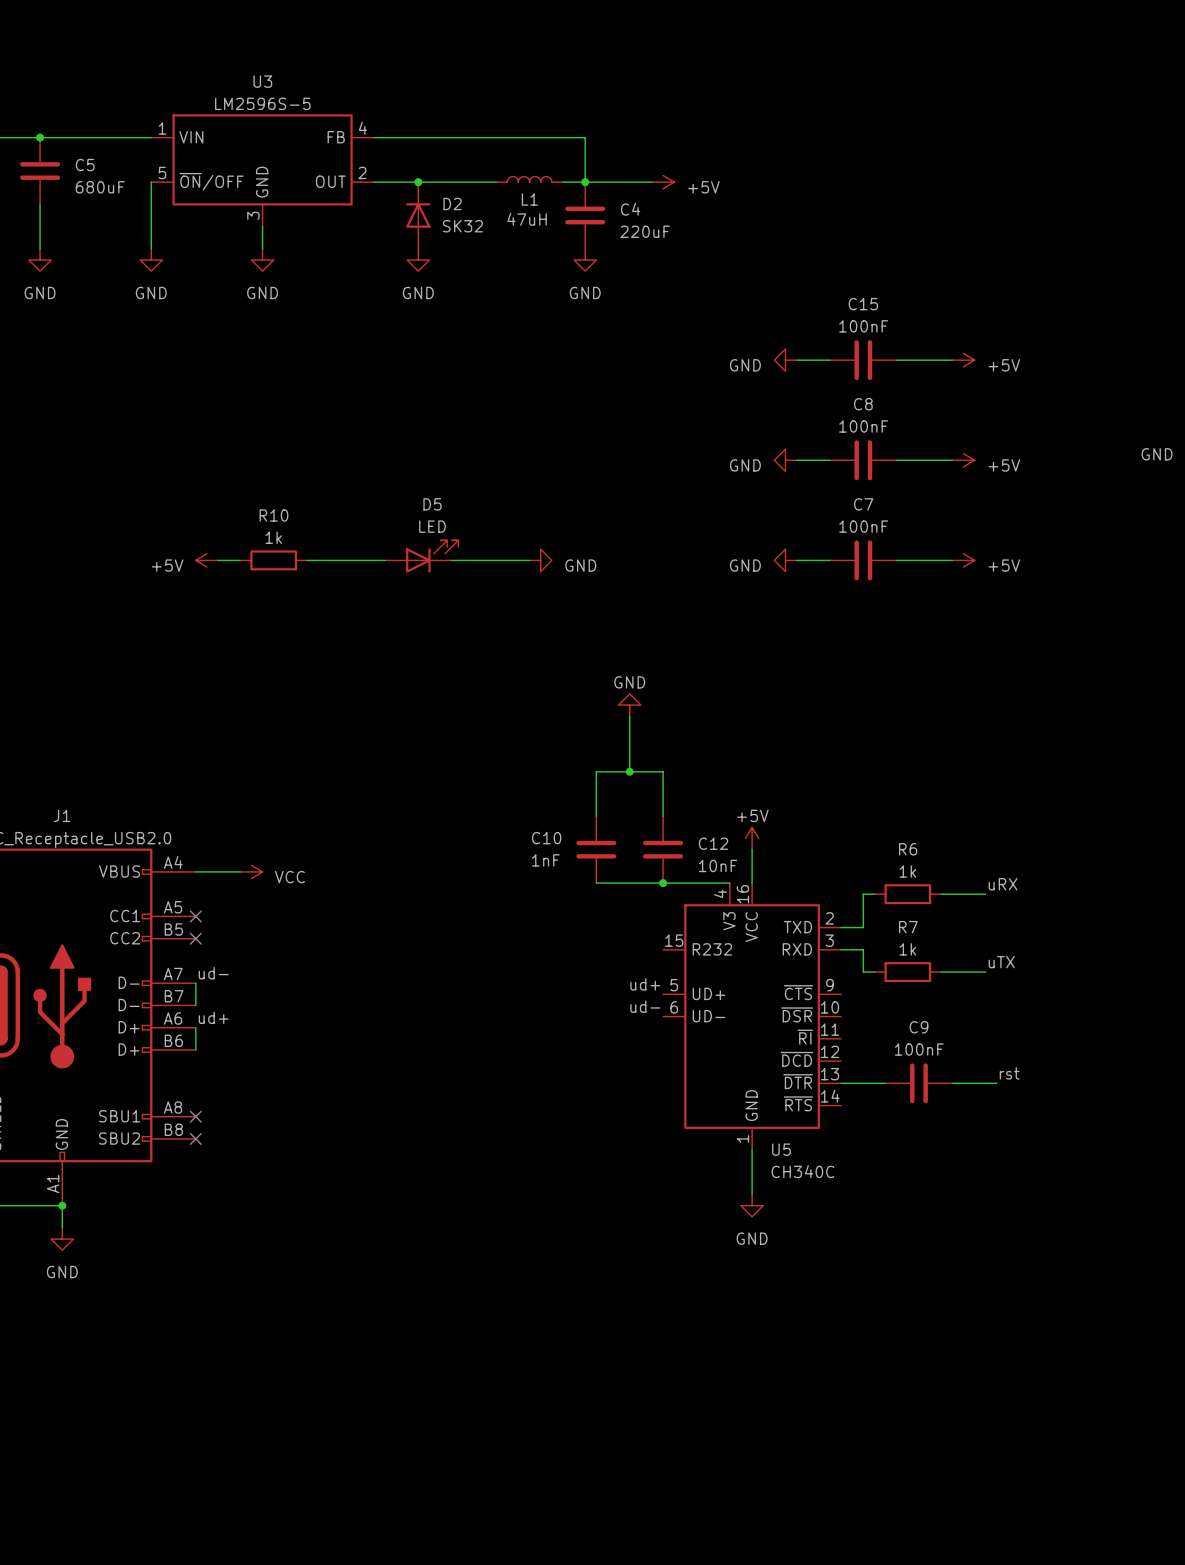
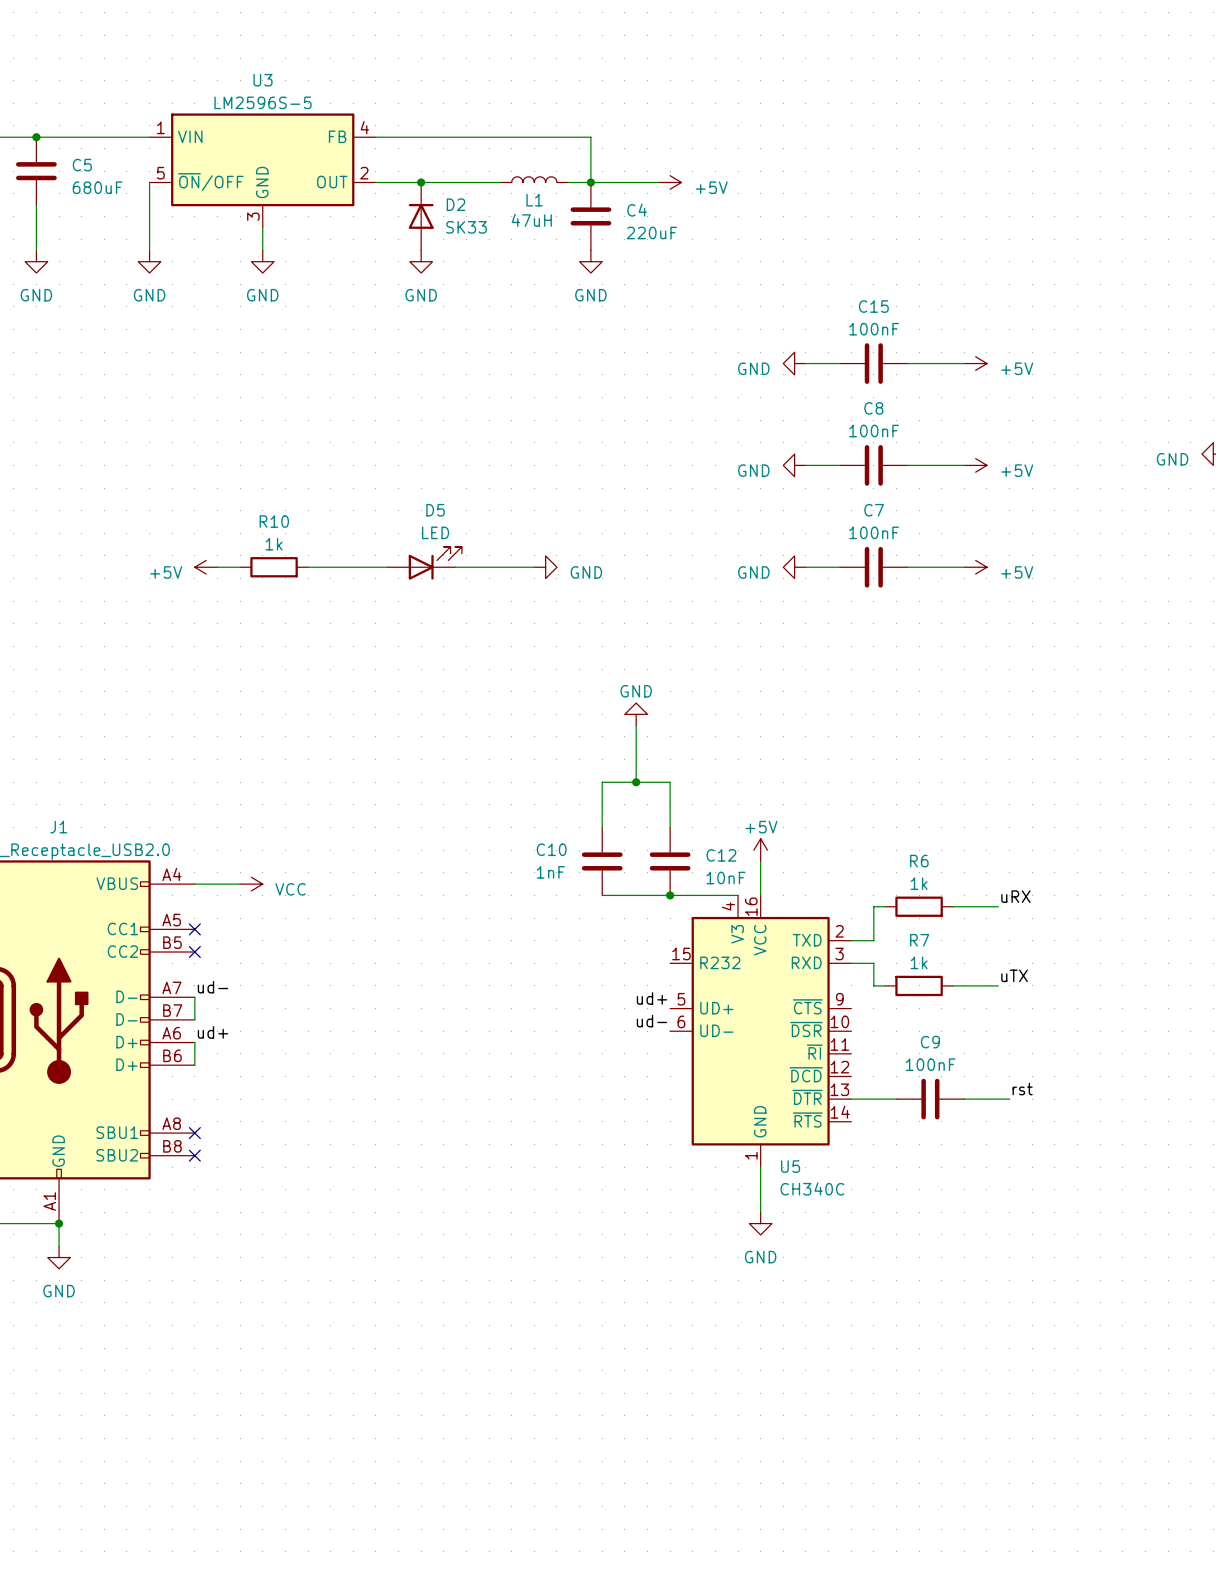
D2 value: SK32 (462, 226) -> SK33 (466, 227)

